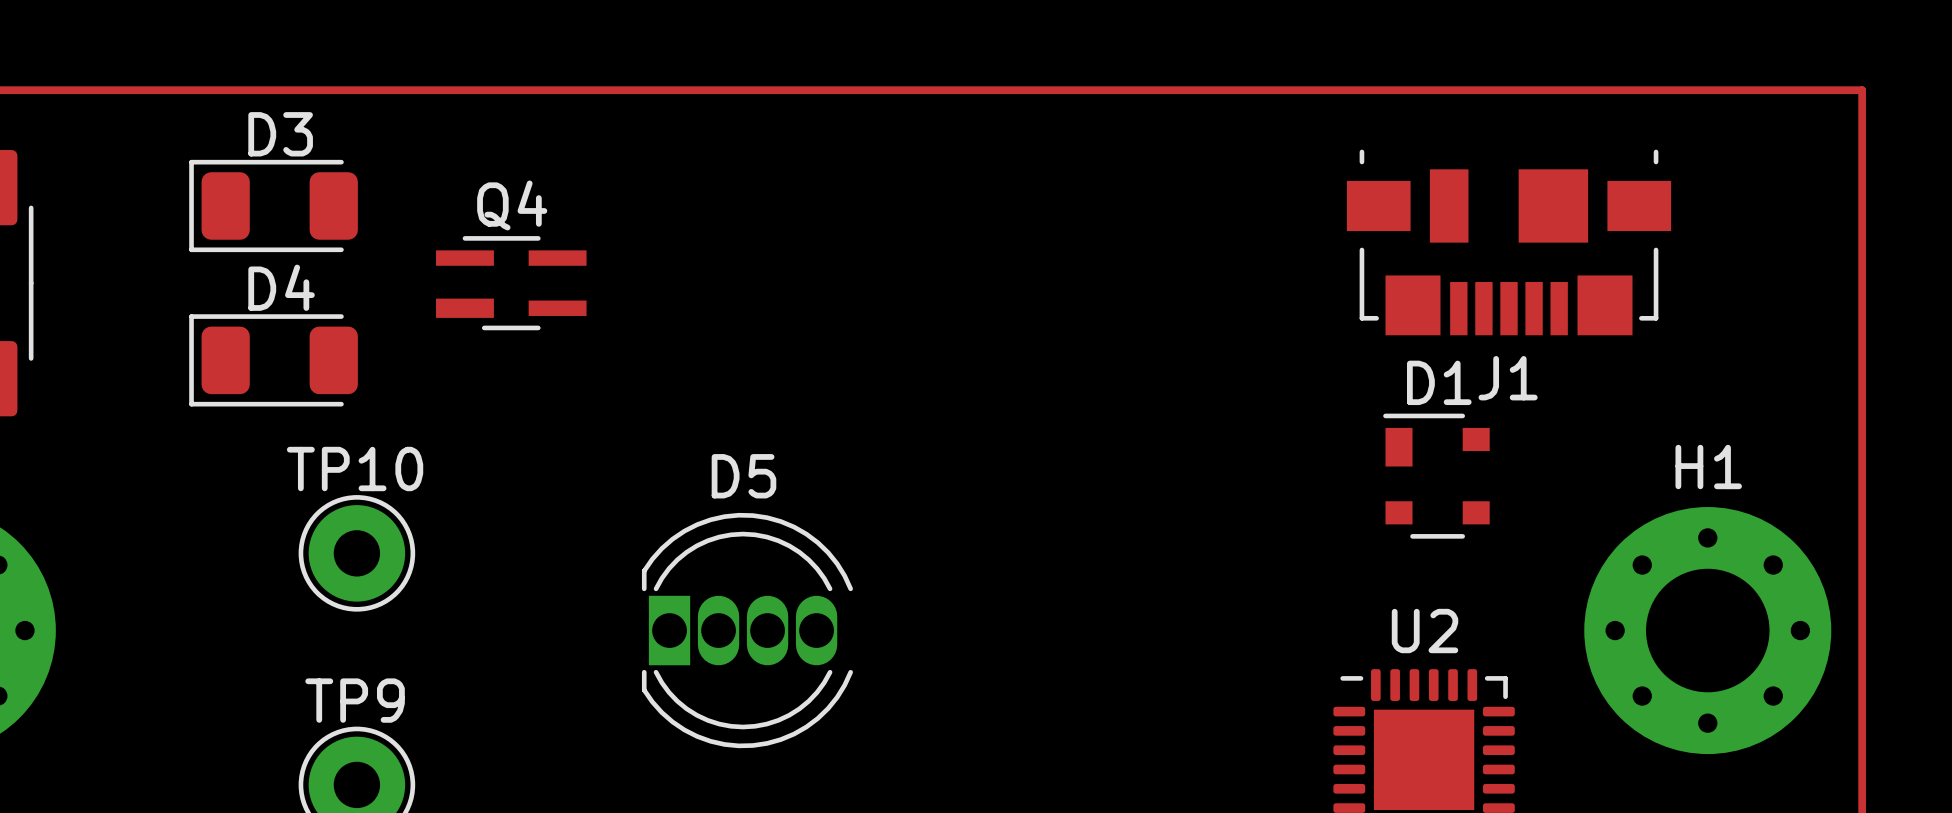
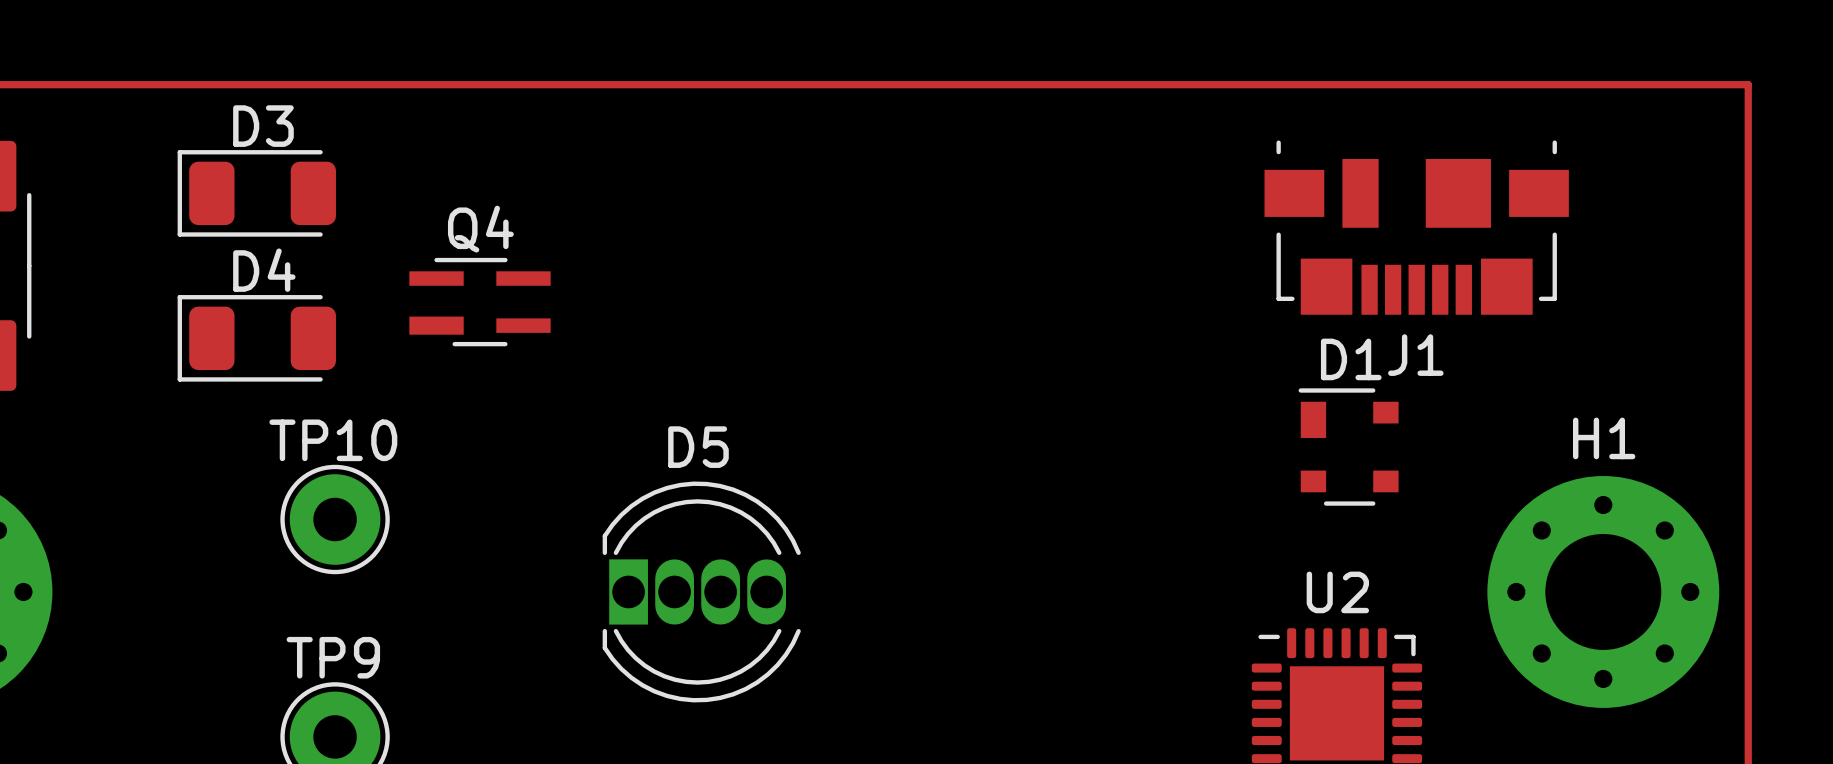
Q4 position: (511, 283) -> (480, 302)

